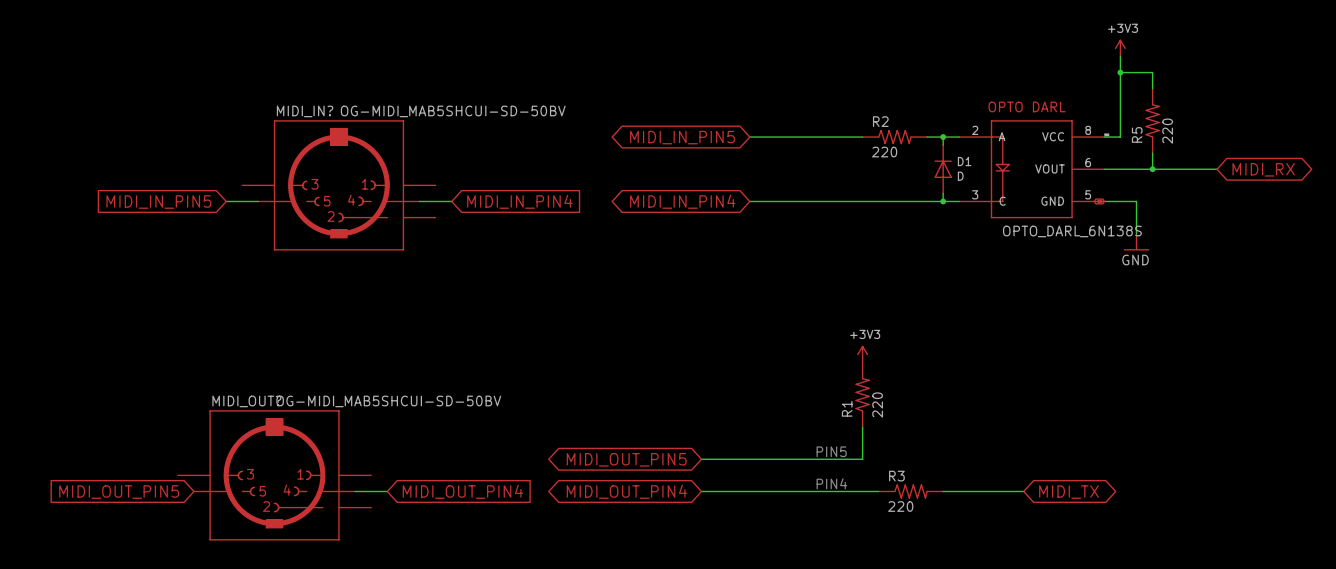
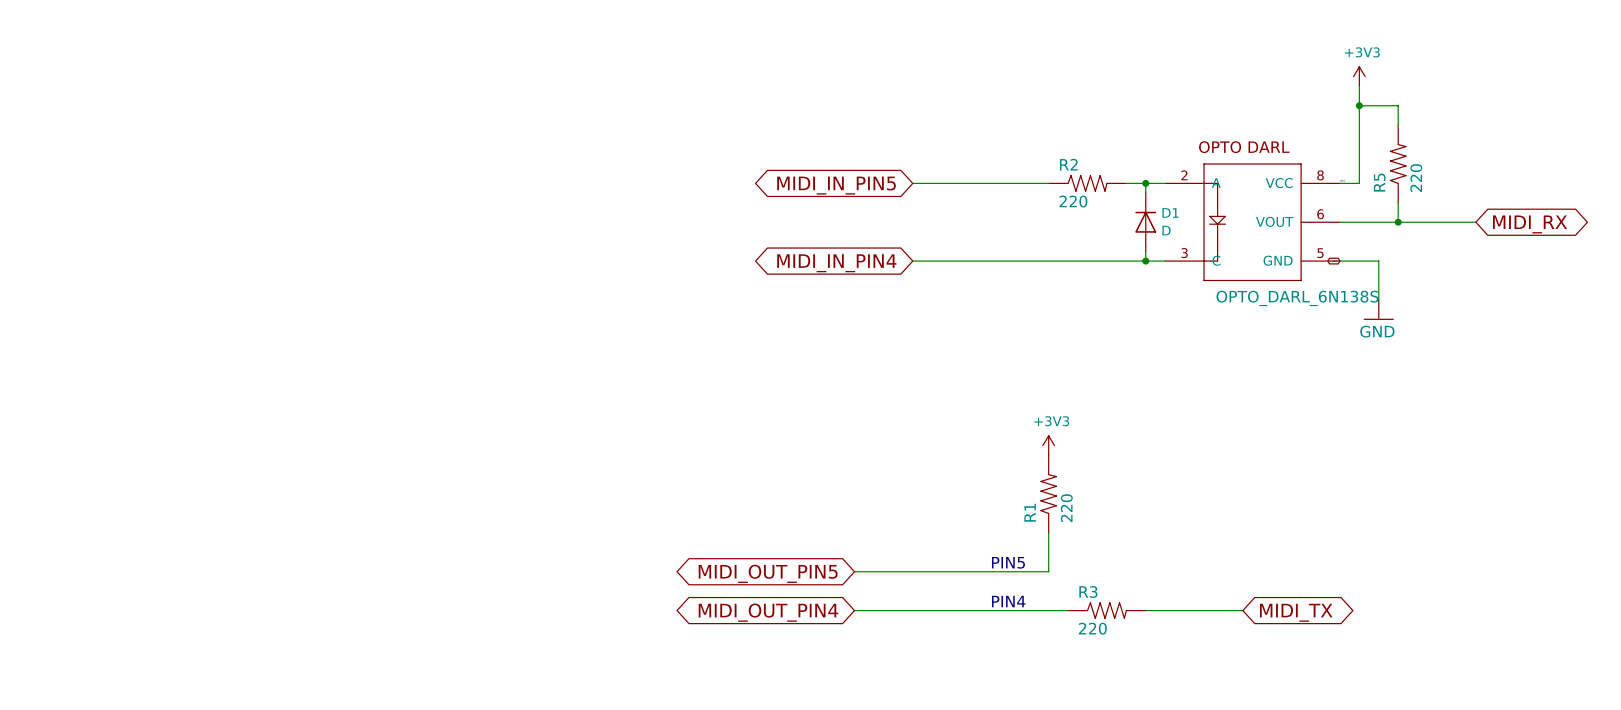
MIDI_IN?: OG-MIDI_MAB5SHCUI-SD-50BV (338, 185) -> none
wire: (226, 201) (258, 201) -> none
wire: (419, 201) (451, 201) -> none
global label: MIDI_IN_PIN4 (519, 201) -> none
global label: MIDI_IN_PIN5 (158, 202) -> none
MIDI_OUT?: OG-MIDI_MAB5SHCUI-SD-50BV (274, 475) -> none
wire: (355, 491) (387, 491) -> none
global label: MIDI_OUT_PIN4 (462, 491) -> none
global label: MIDI_OUT_PIN5 (119, 492) -> none

